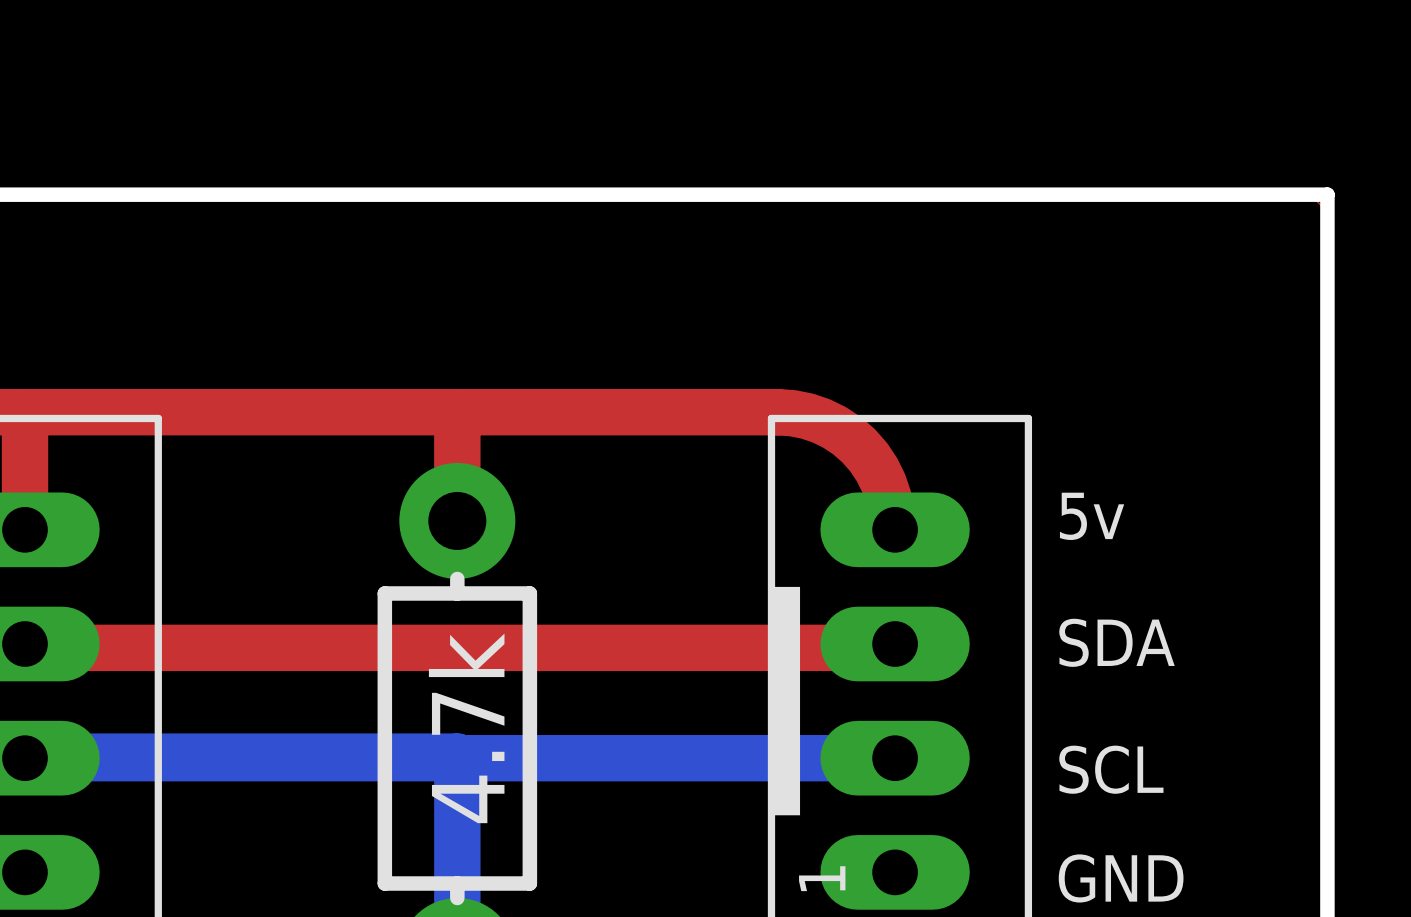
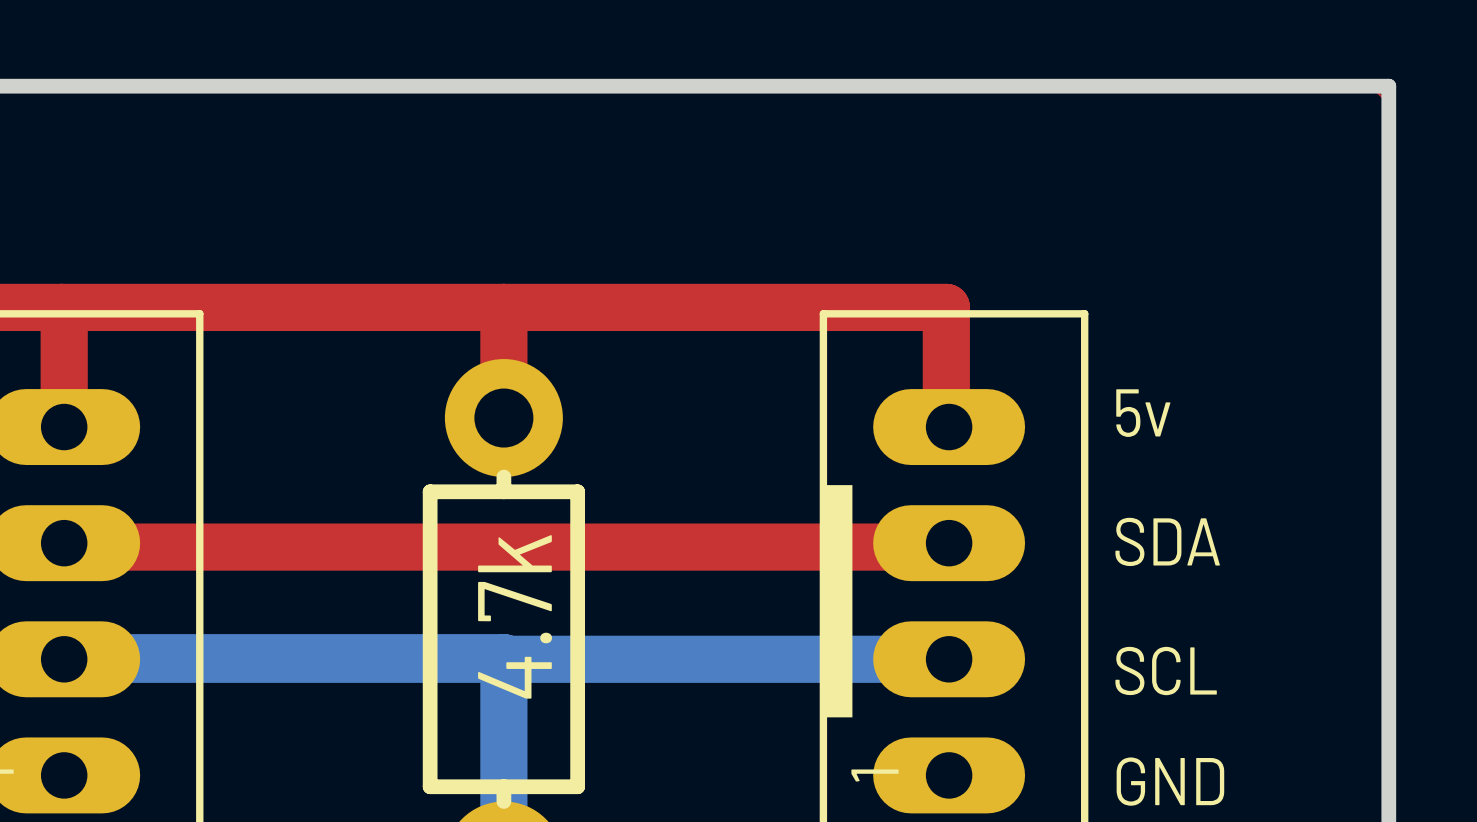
top track: (777, 412) (792, 413) (821, 420) (847, 435) (858, 445) (868, 457) (883, 483) (888, 497) (892, 527) -> (829, 307) (946, 307) (946, 424)

